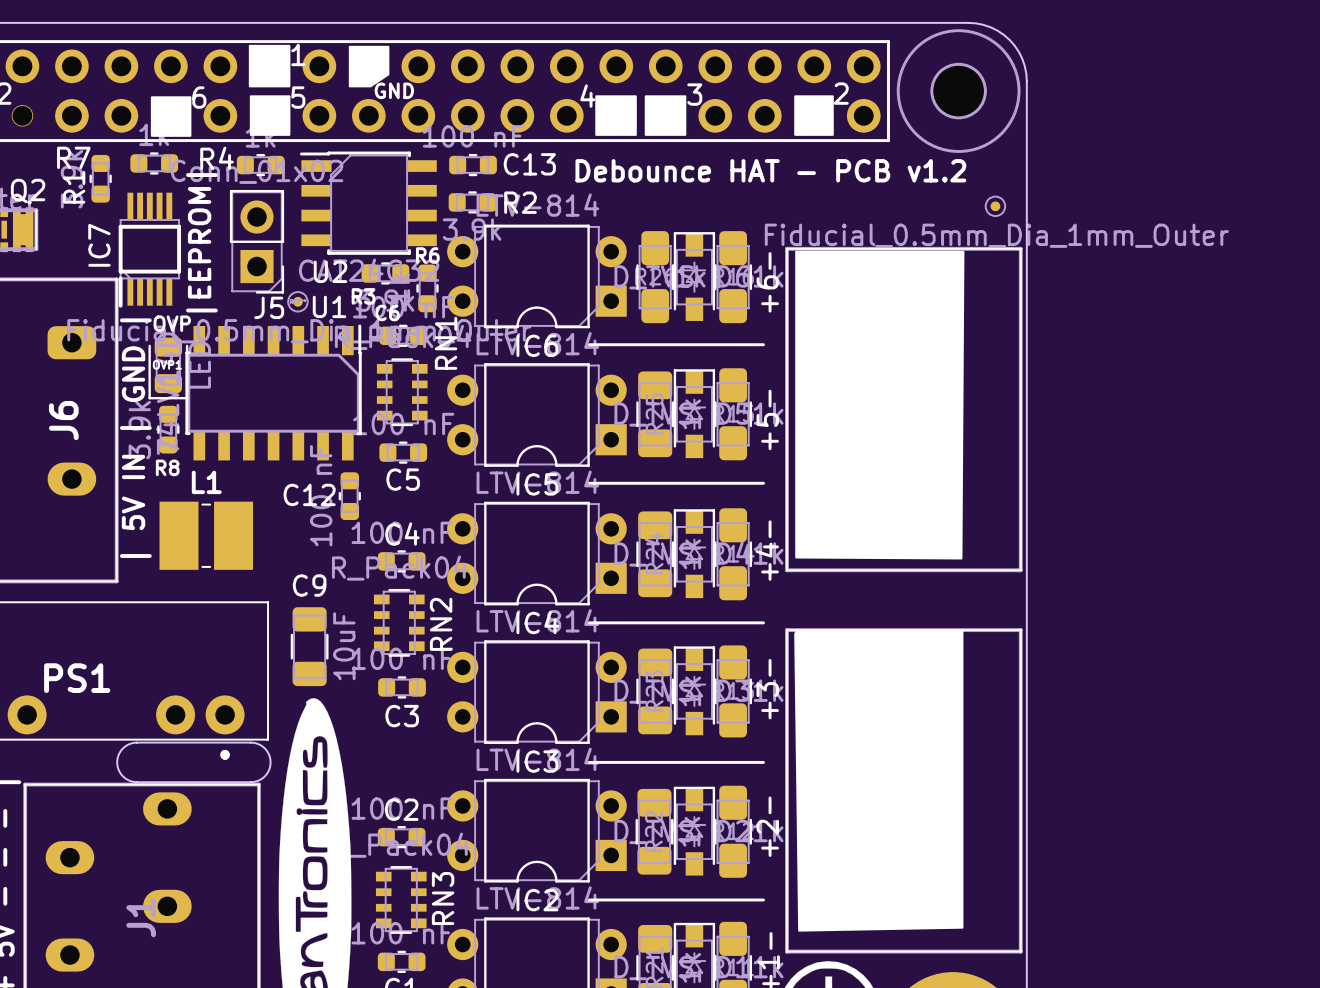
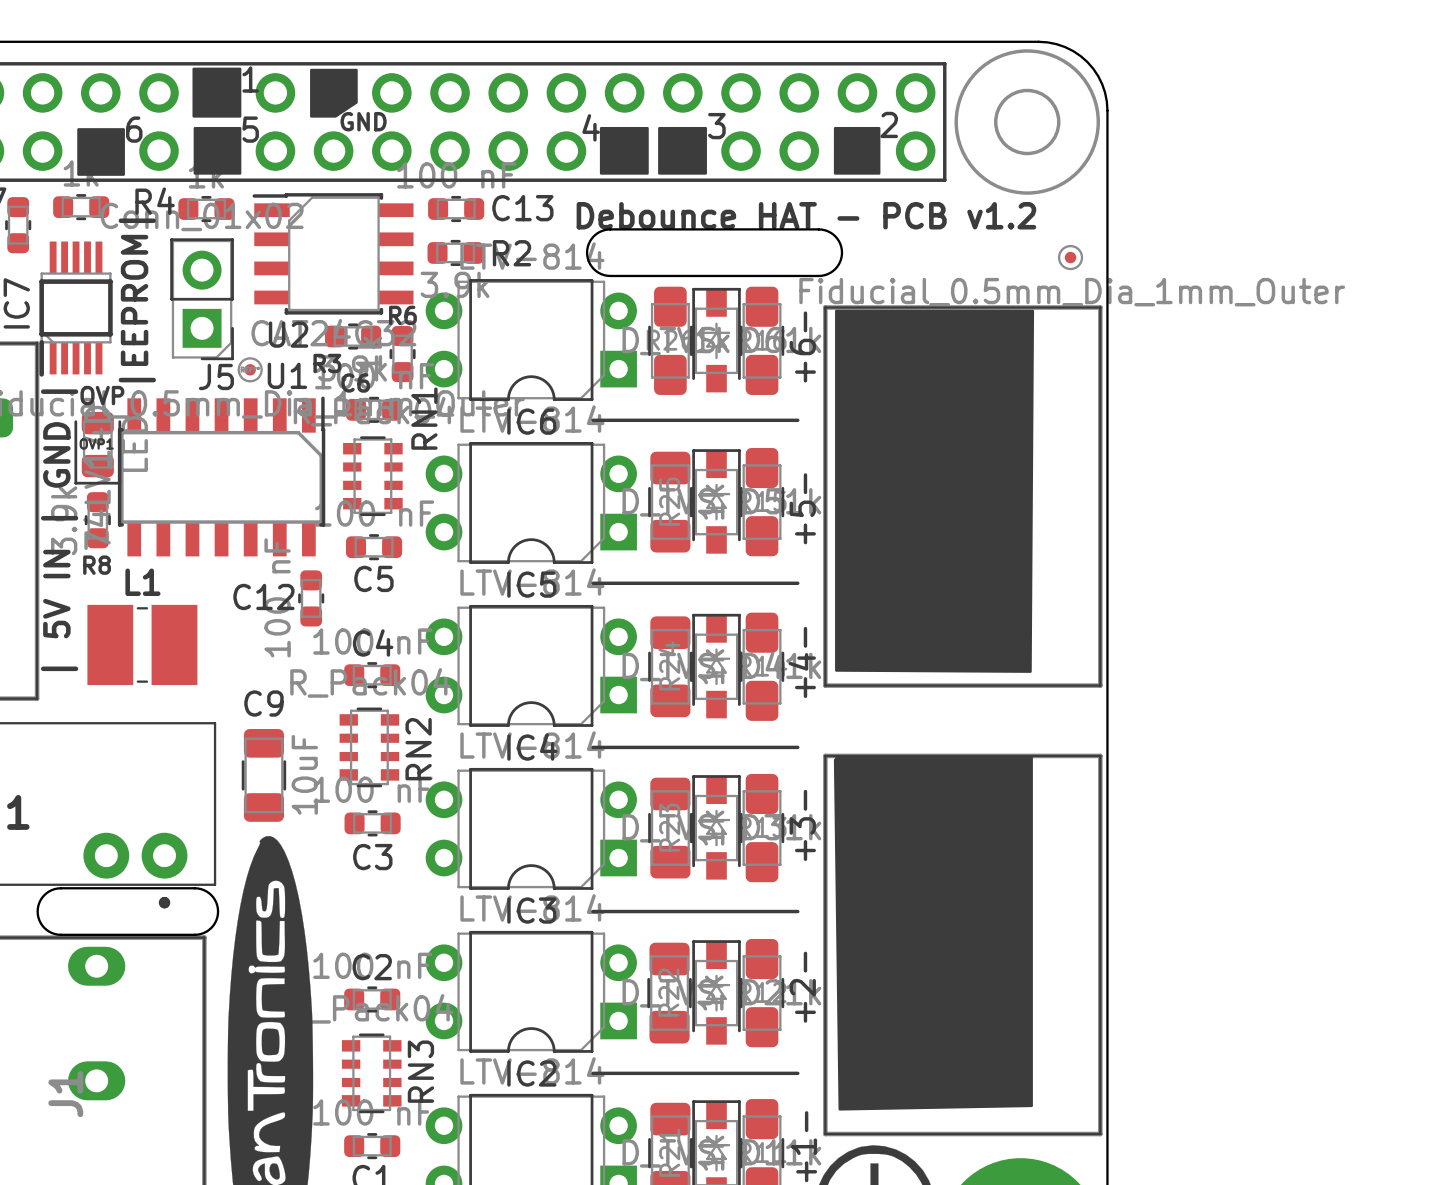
board edge: none -> (610, 229) (821, 229) (830, 232) (837, 238) (841, 246) (841, 255) (835, 269) (821, 275) (607, 275) (598, 272) (591, 266) (587, 252) (588, 243) (593, 236) (601, 231) (610, 229)

